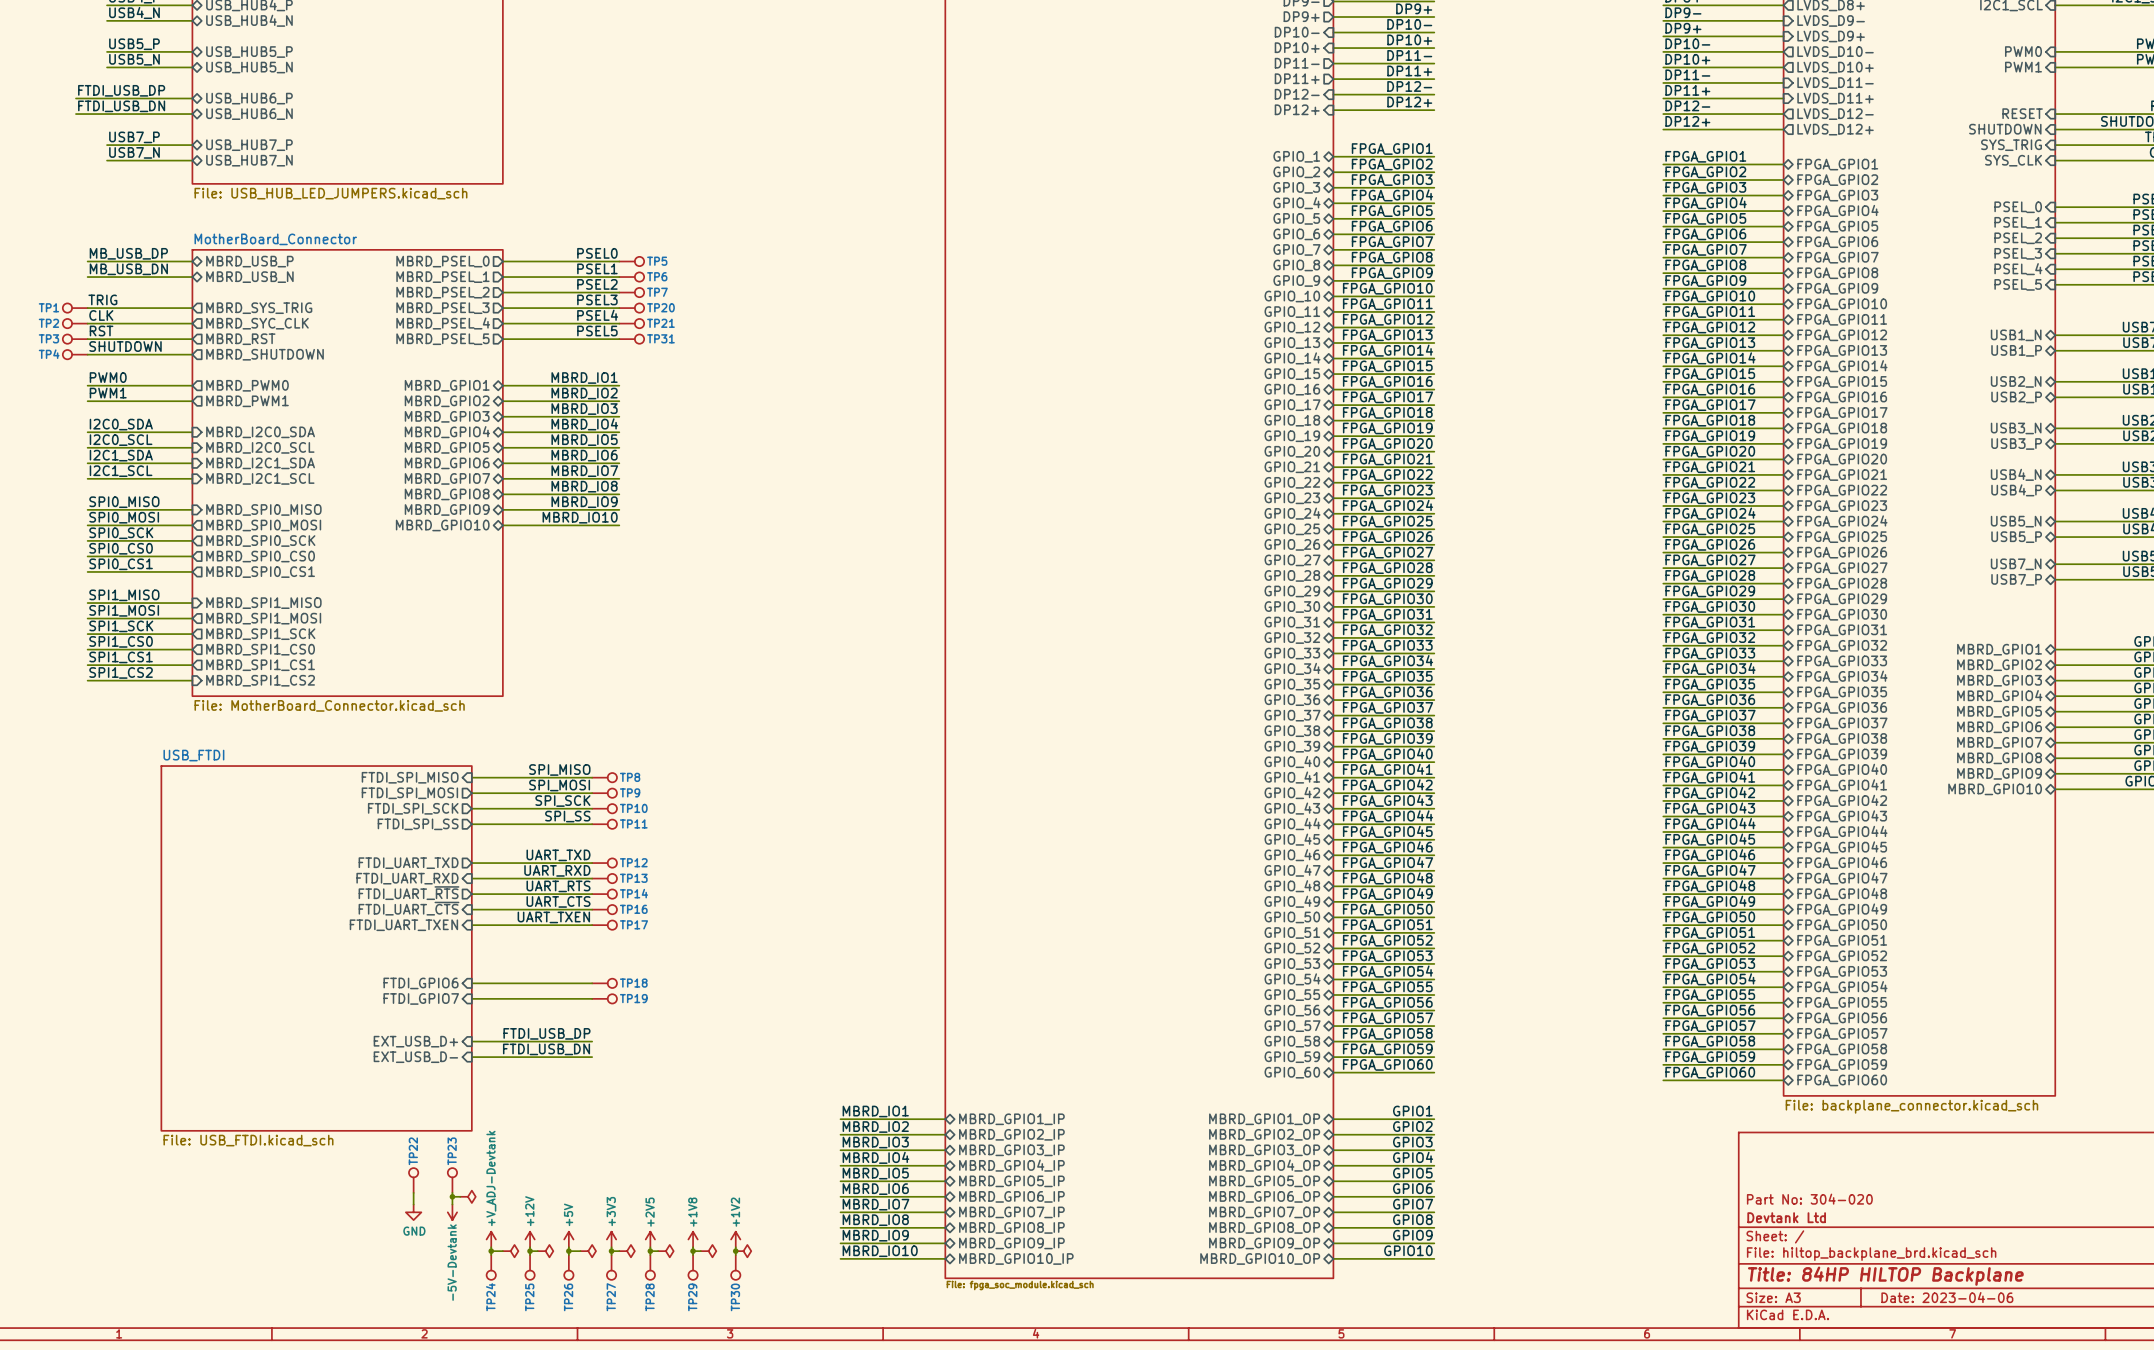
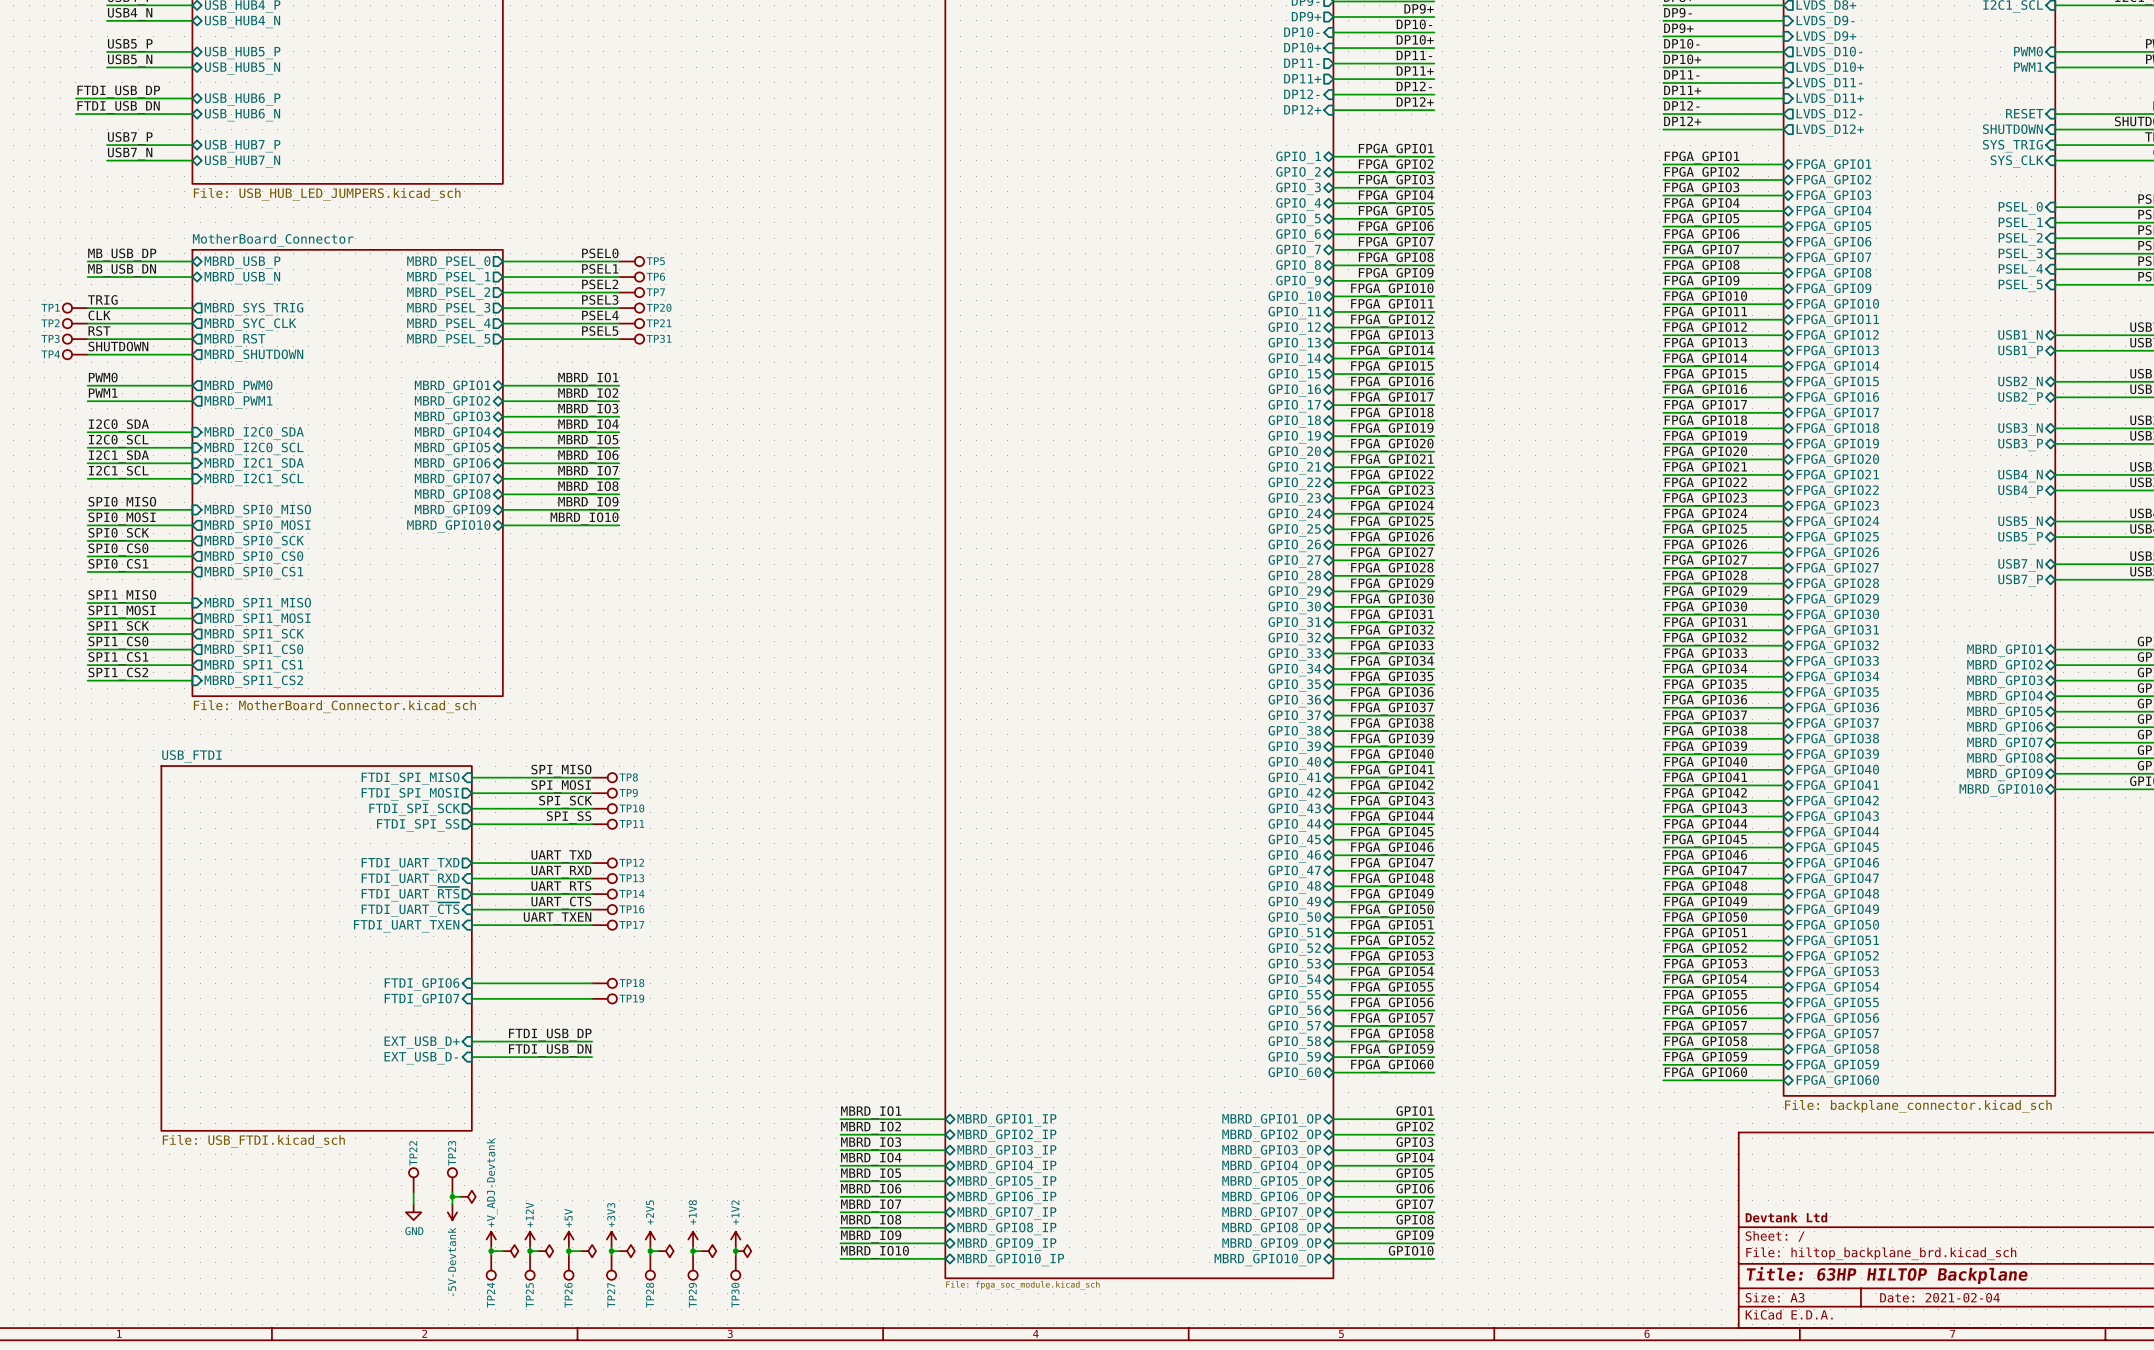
title block: Part No: 304-020 (1809, 1199) -> none
title block: Title: 84HP HILTOP Backplane (1885, 1276) -> Title: 63HP HILTOP Backplane (1887, 1275)
title block: Date: 2023-04-06 (1947, 1297) -> Date: 2021-02-04 (1939, 1297)

